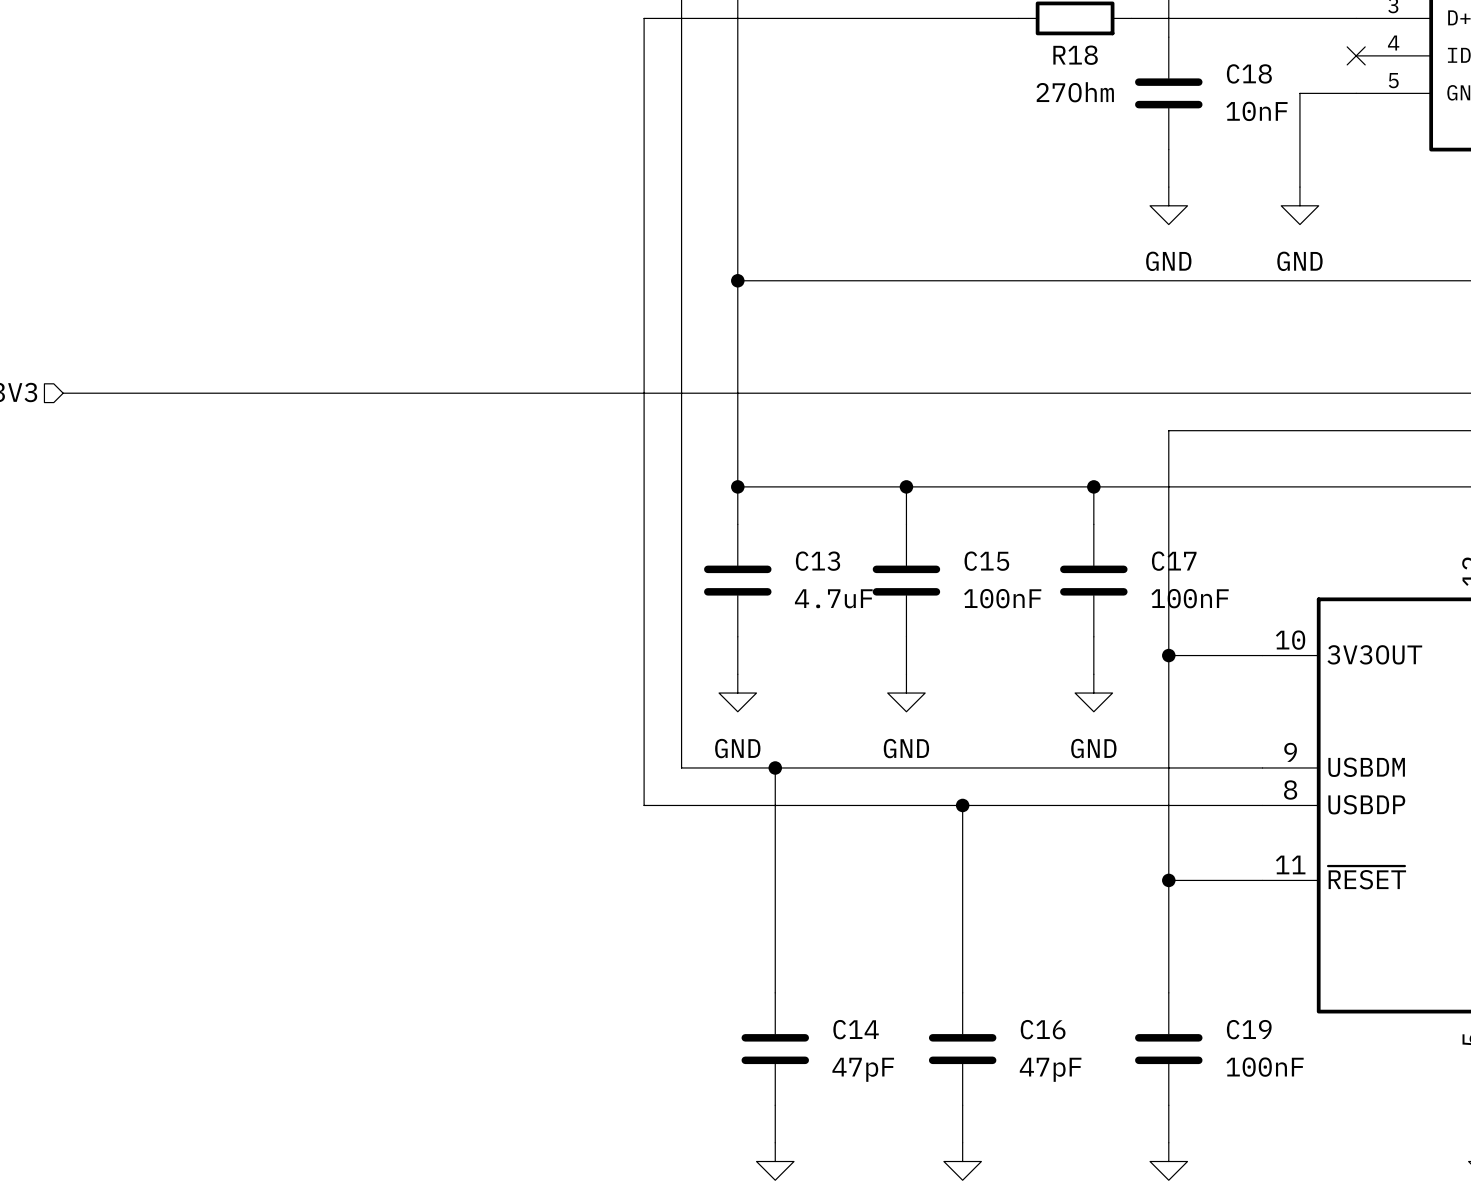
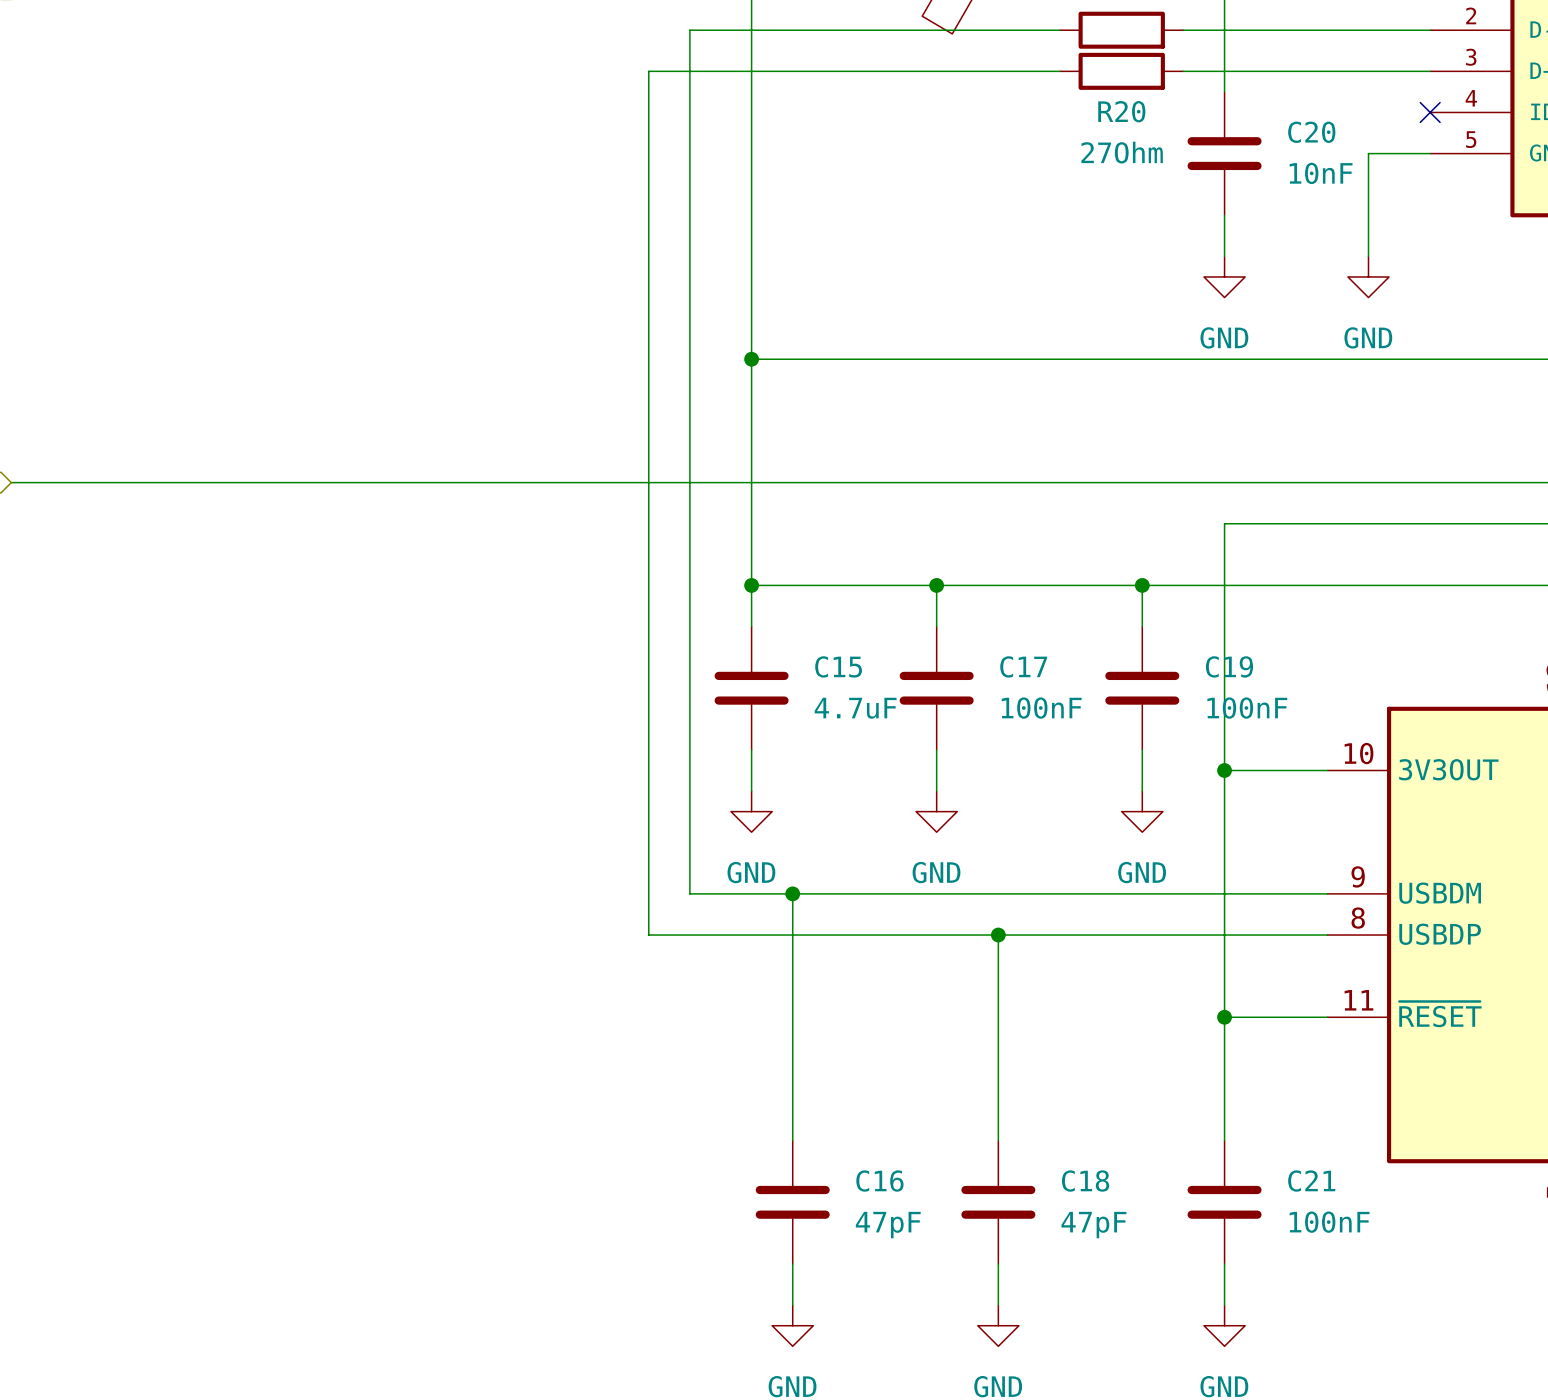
R18 name: R18 (1075, 55) -> R20 (1121, 111)
C18 name: C18 (1249, 73) -> C20 (1311, 132)
C13 name: C13 (818, 561) -> C15 (838, 666)
C15 name: C15 (986, 561) -> C17 (1023, 666)
C17 name: C17 (1174, 561) -> C19 (1229, 666)
C14 name: C14 (856, 1029) -> C16 (879, 1181)
C16 name: C16 (1043, 1029) -> C18 (1085, 1181)
C19 name: C19 (1249, 1029) -> C21 (1311, 1181)

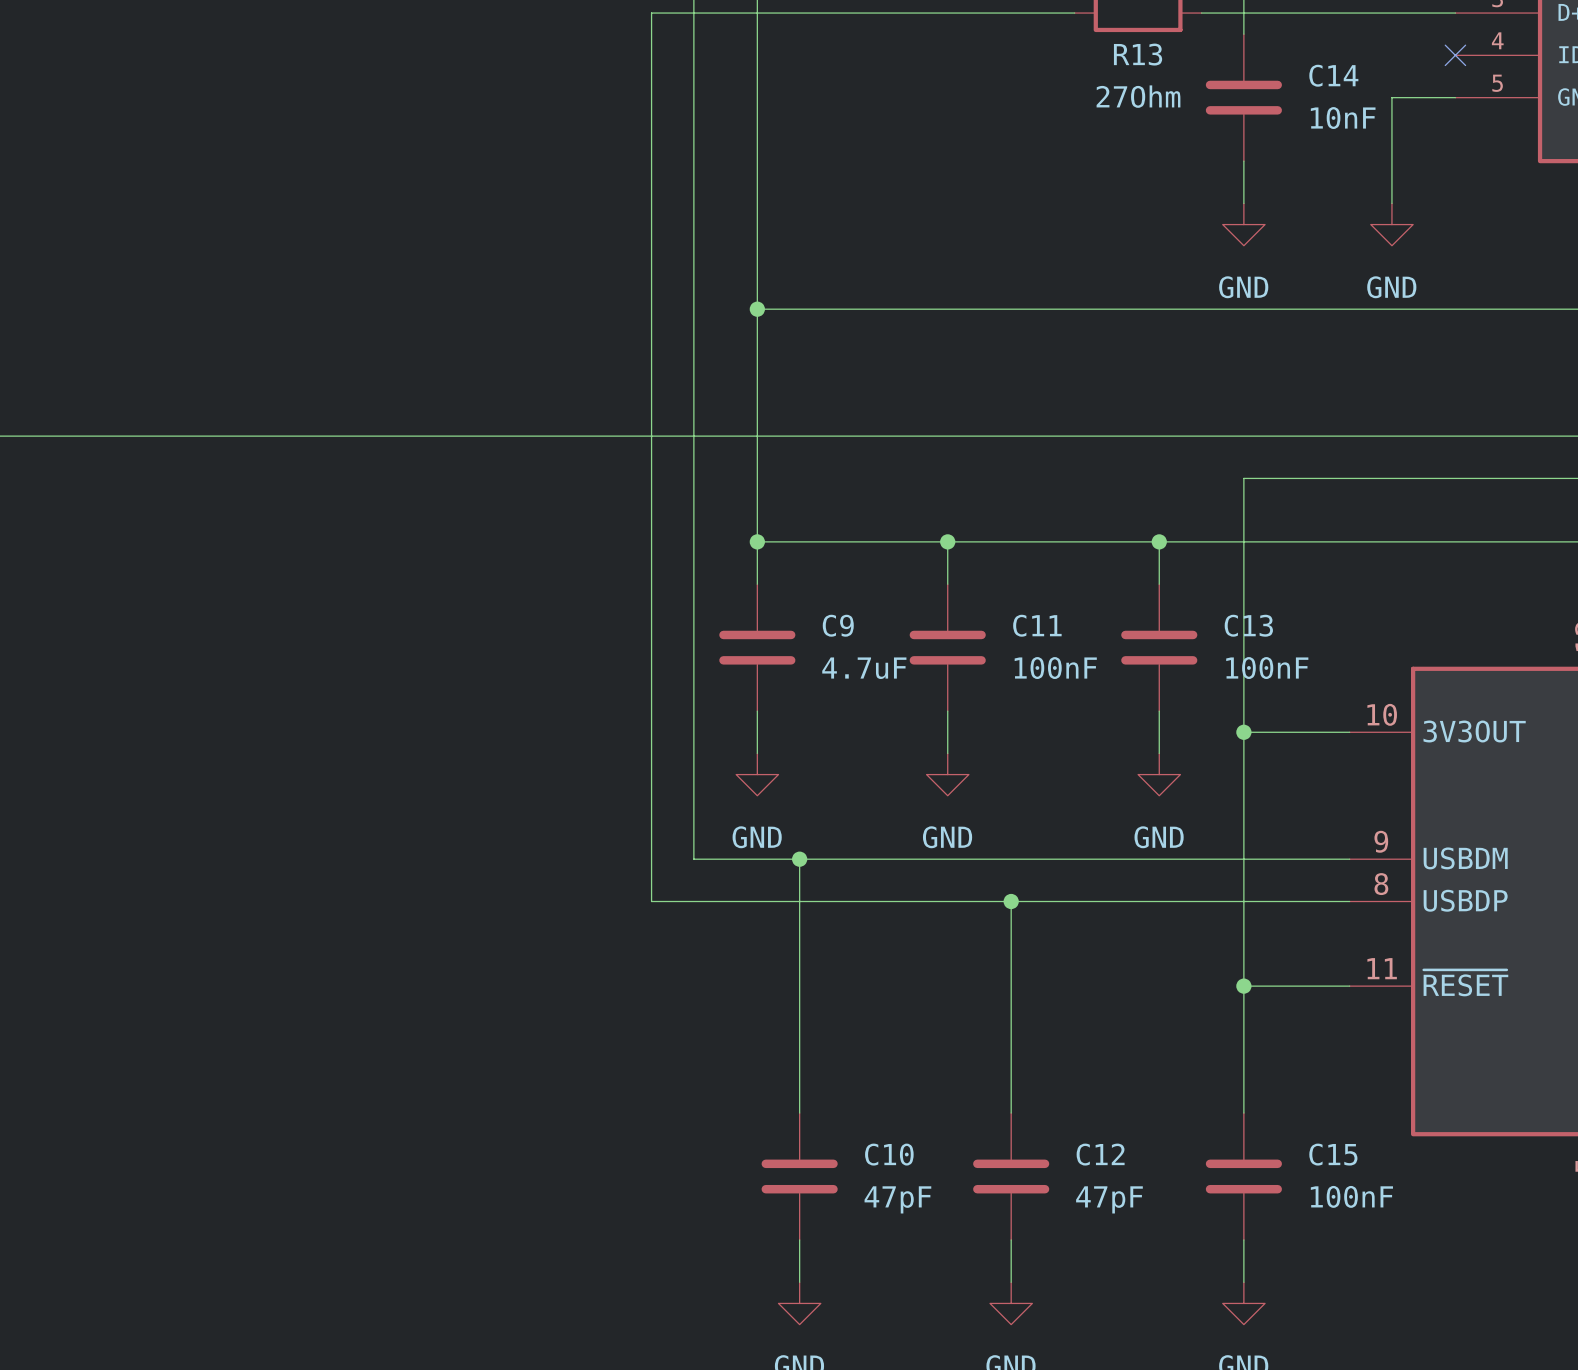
R20 name: R20 (1121, 111) -> R13 (1138, 54)
C20 name: C20 (1311, 132) -> C14 (1333, 75)
C15 name: C15 (838, 666) -> C9 (838, 625)
C17 name: C17 (1023, 666) -> C11 (1037, 625)
C19 name: C19 (1229, 666) -> C13 (1248, 625)
C16 name: C16 (879, 1181) -> C10 (889, 1154)
C18 name: C18 (1085, 1181) -> C12 (1100, 1154)
C21 name: C21 (1311, 1181) -> C15 (1333, 1154)

